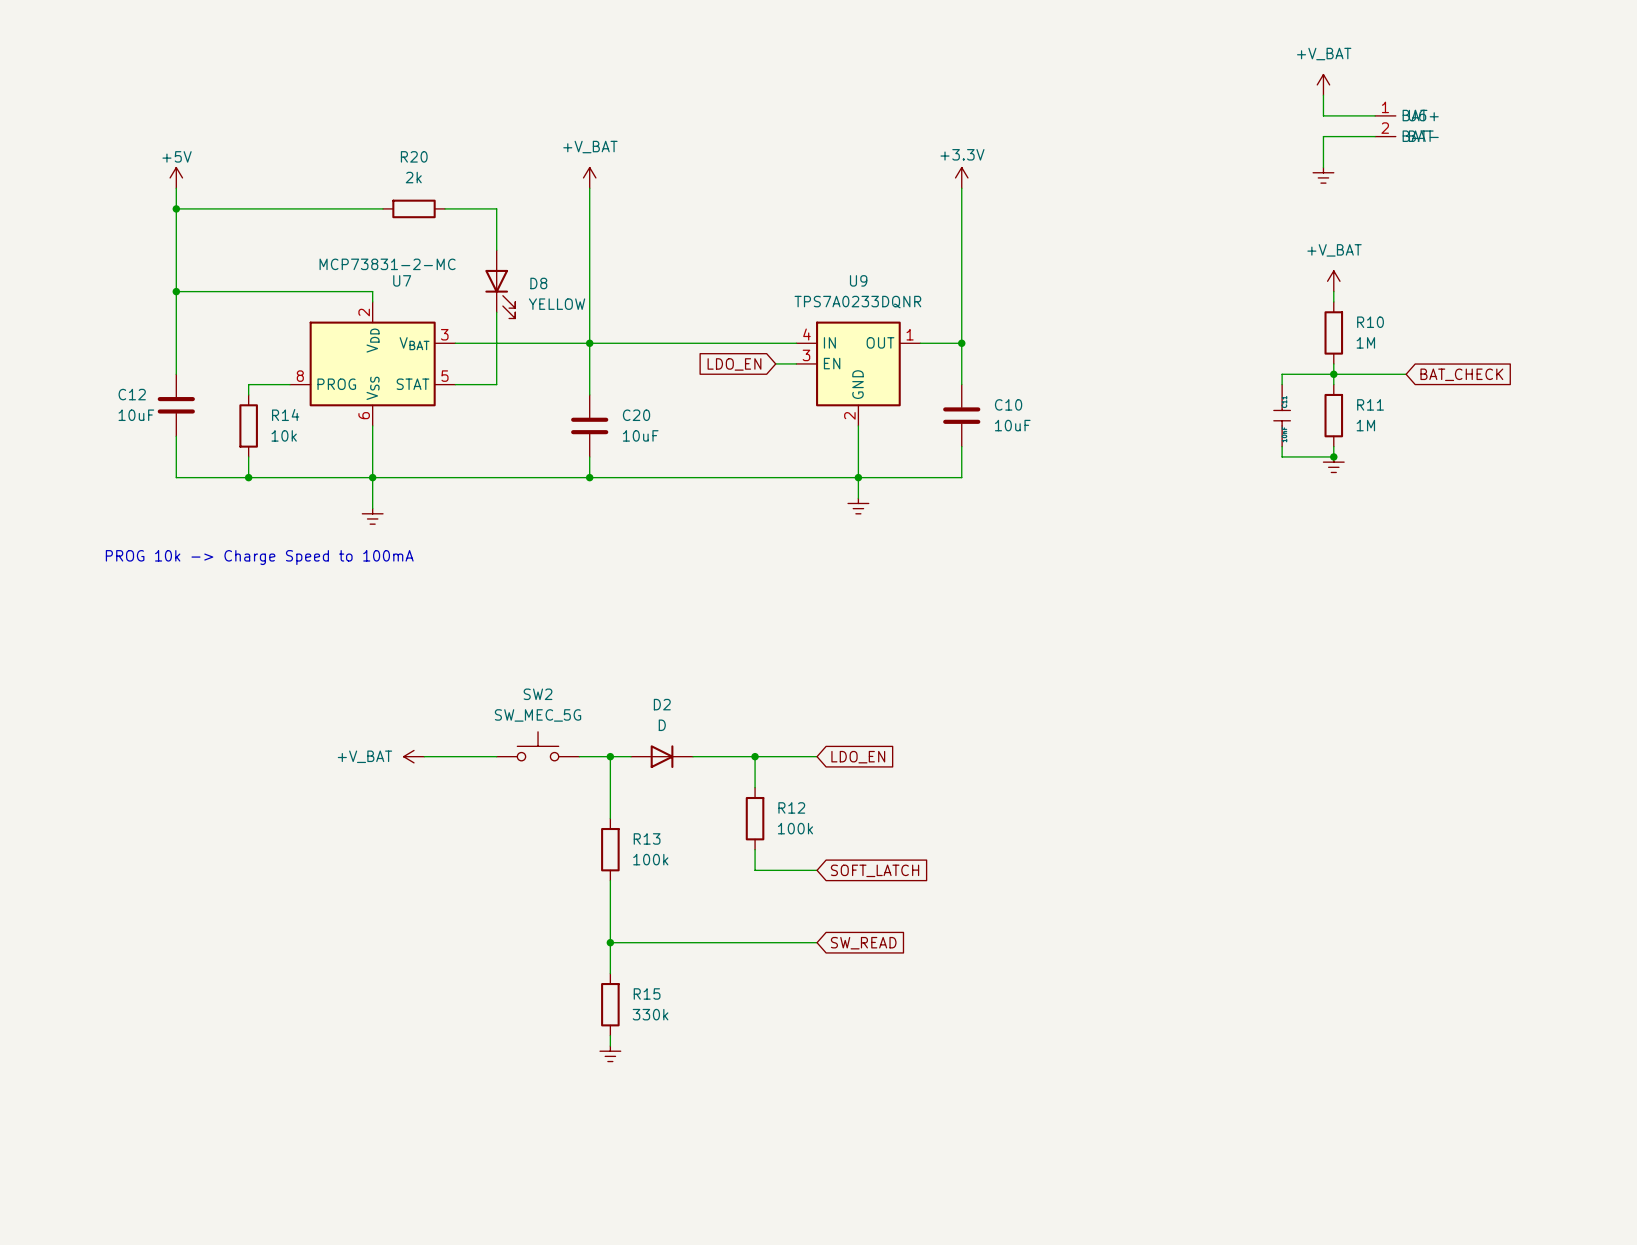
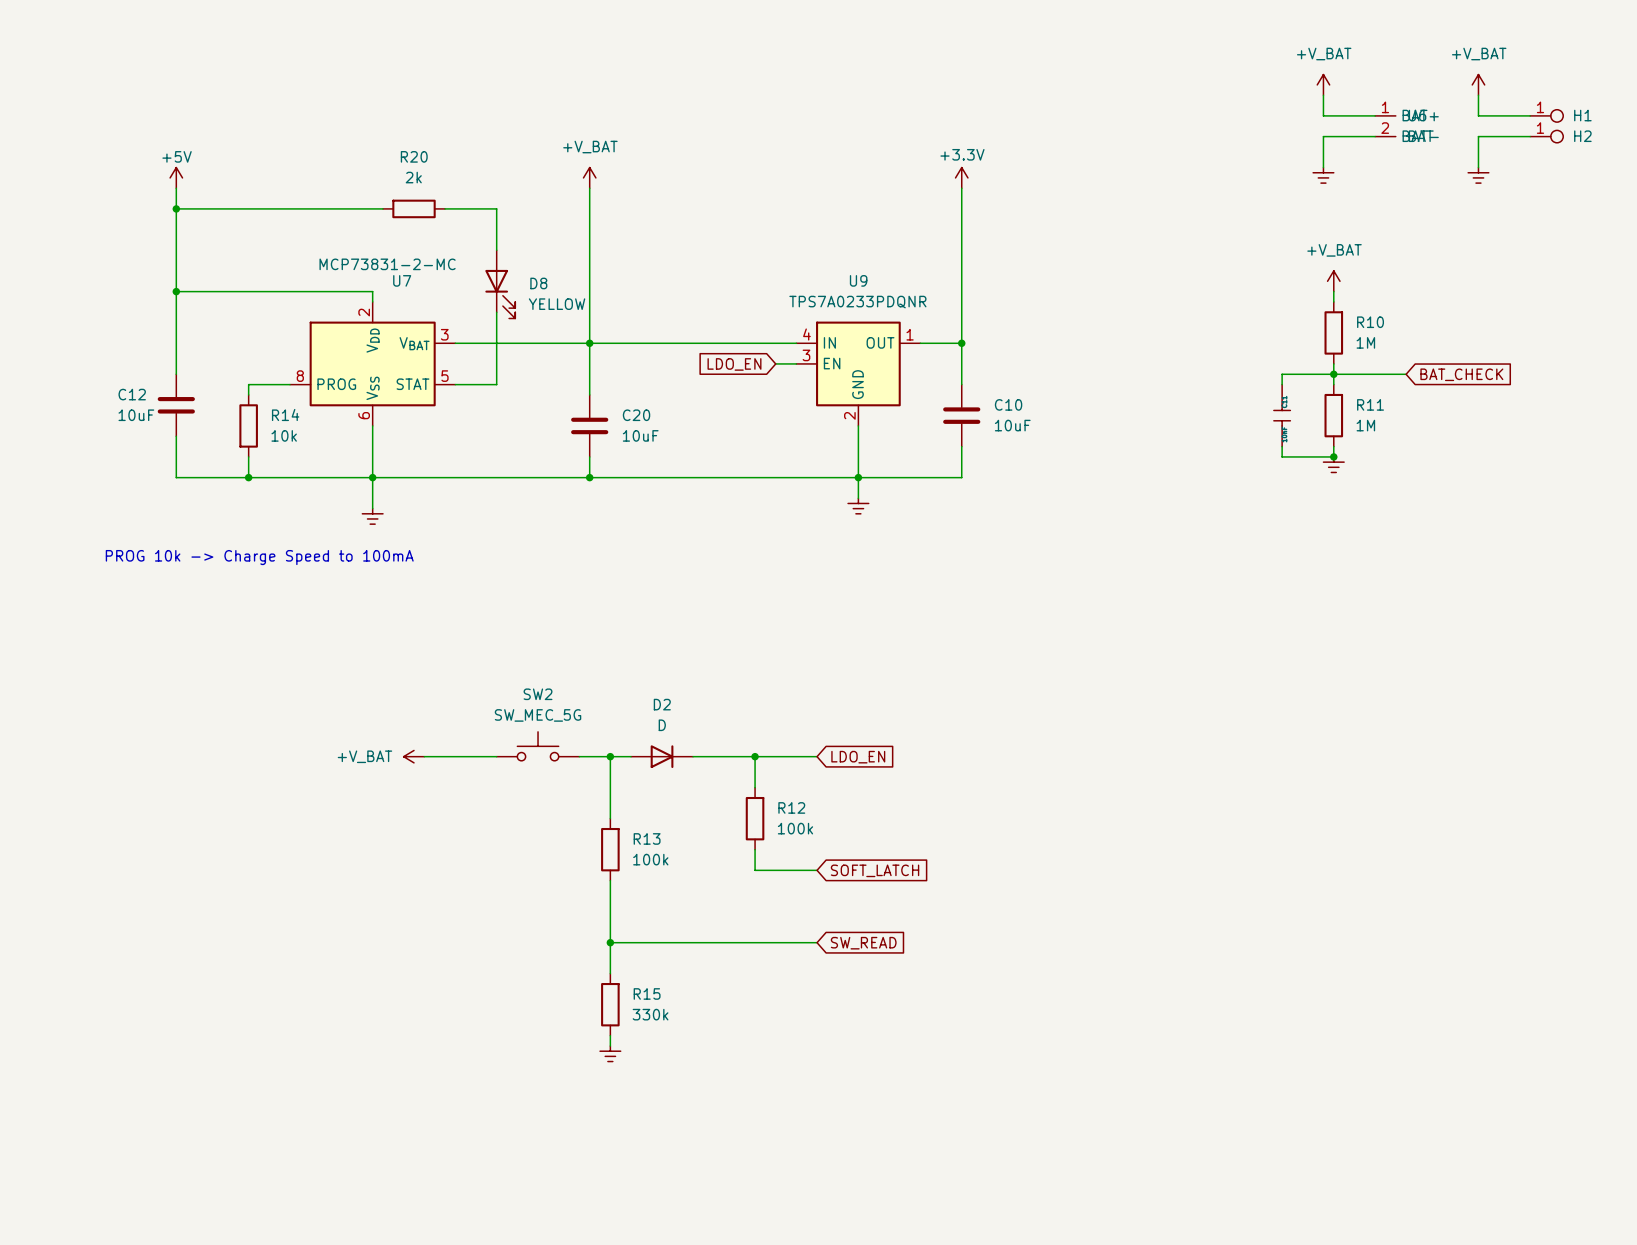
power symbol: none -> +V_BAT (1478, 84)
wire: none -> (1478, 95) (1478, 115) (1530, 115)
H1: none -> (1546, 115)
wire: none -> (1530, 136) (1478, 136) (1478, 167)
H2: none -> (1546, 136)
power symbol: none -> (1478, 175)
U9 value: TPS7A0233DQNR (857, 302) -> TPS7A0233PDQNR (857, 302)

